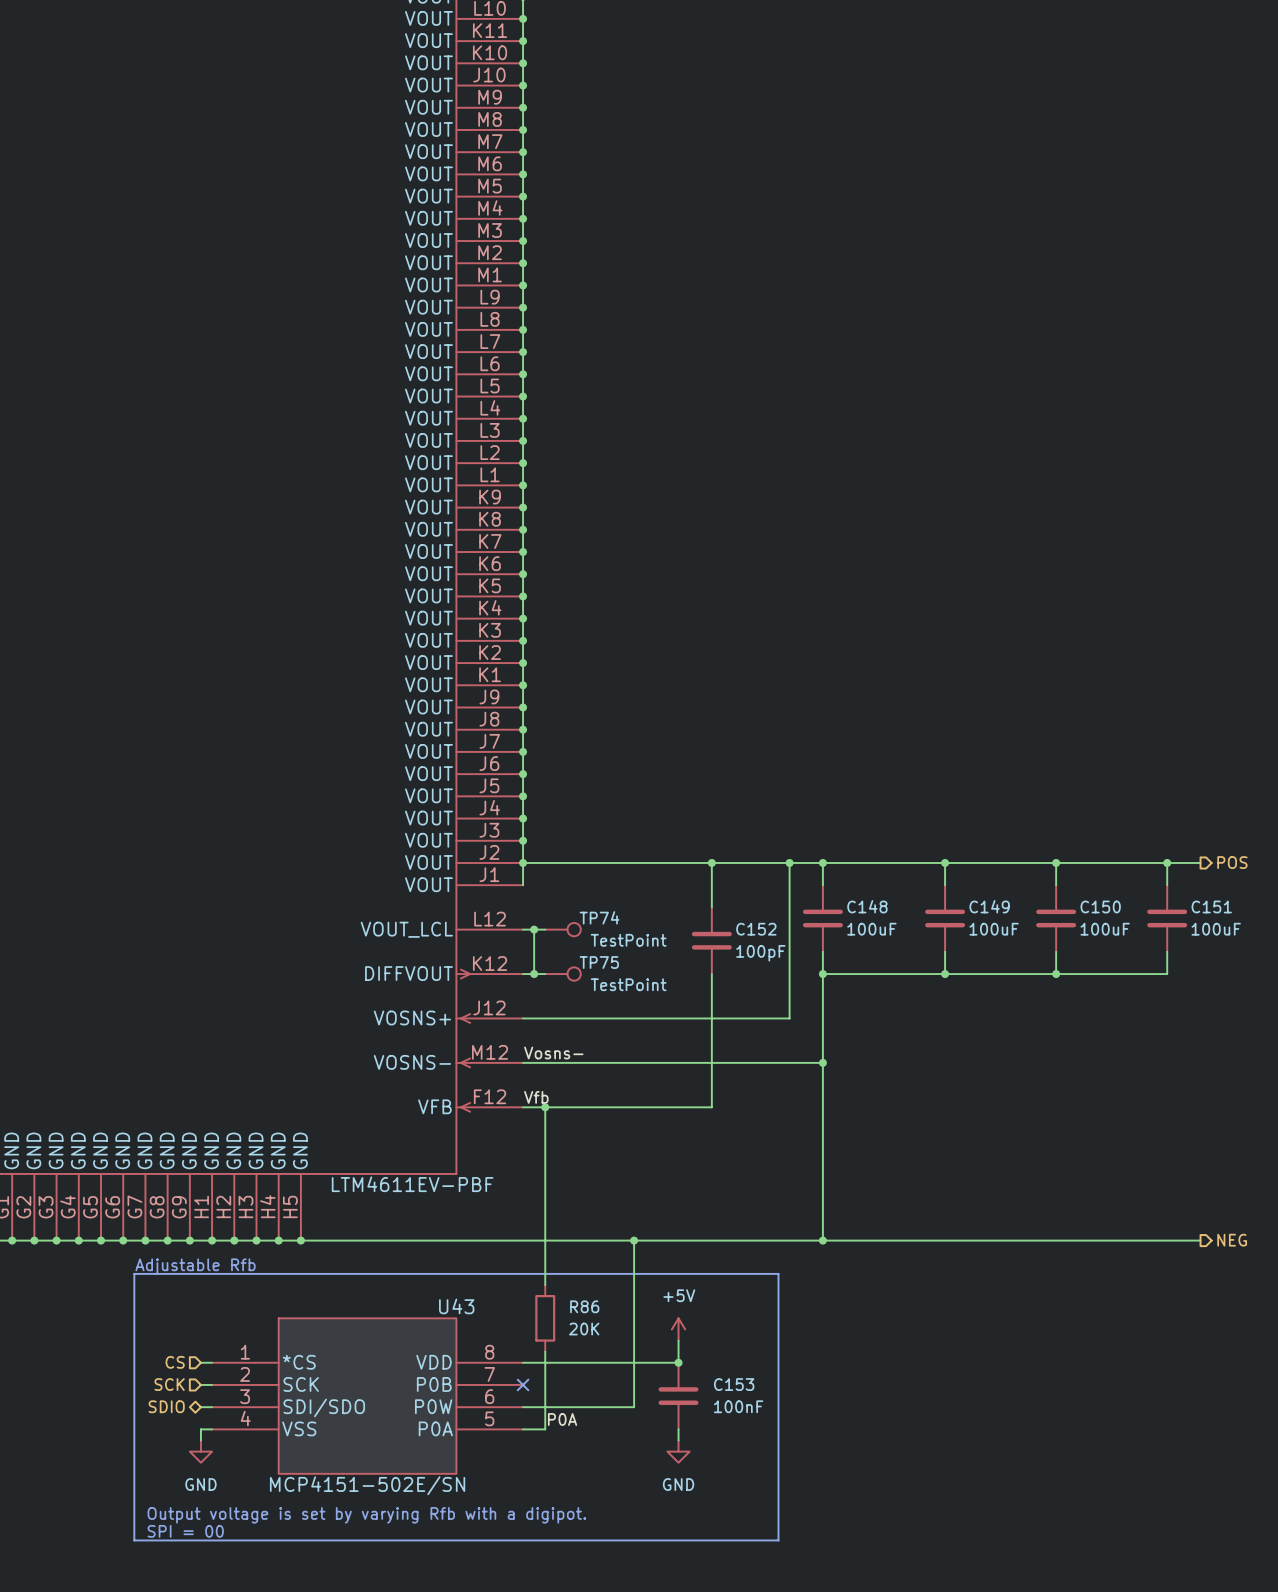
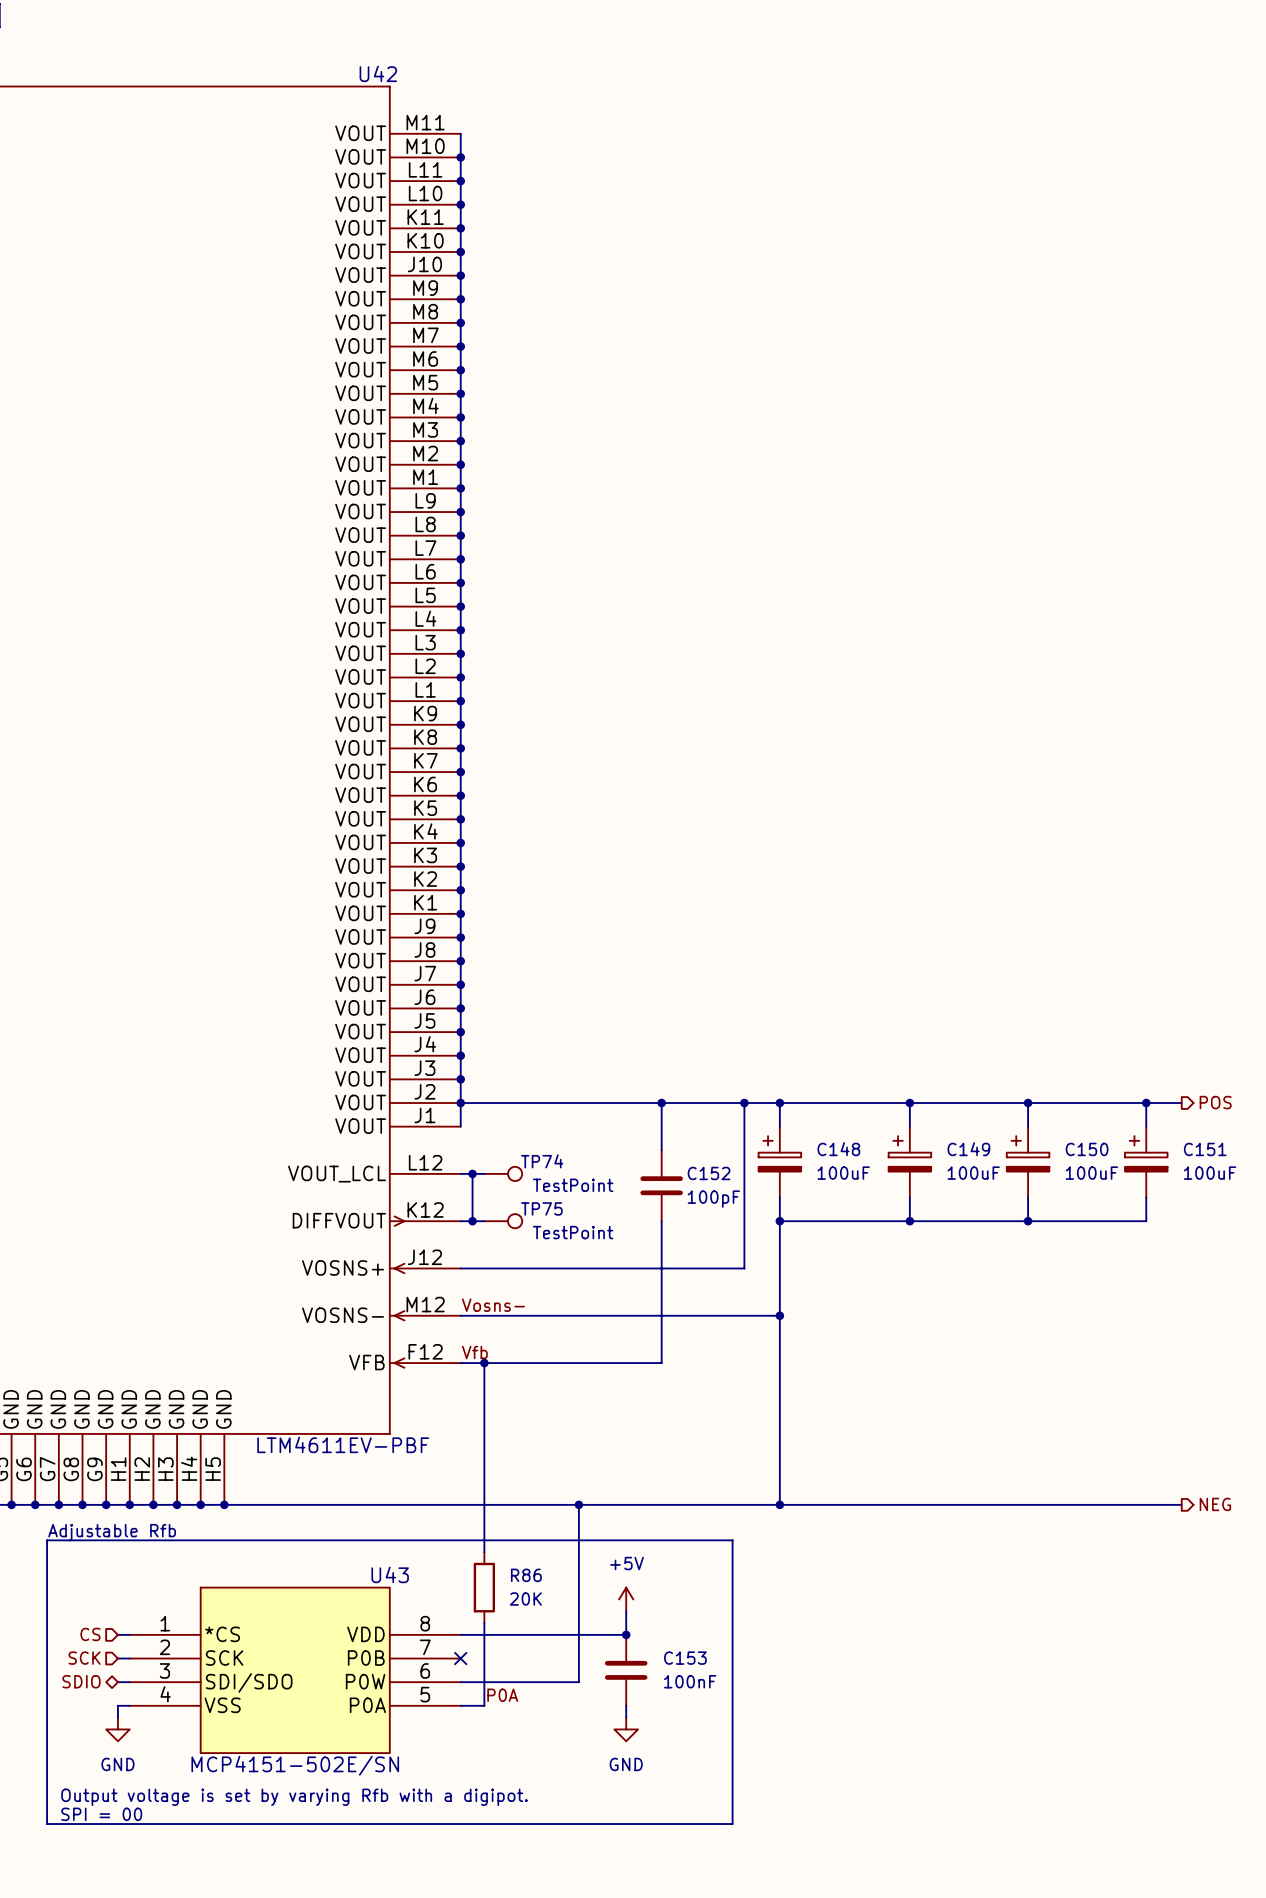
C148 symbol: [802, 885, 843, 952] -> [758, 1126, 802, 1198]
C149 symbol: [925, 885, 966, 952] -> [888, 1126, 932, 1198]
C150 symbol: [1036, 885, 1077, 952] -> [1006, 1126, 1050, 1198]
C151 symbol: [1147, 885, 1188, 952] -> [1124, 1126, 1168, 1198]

